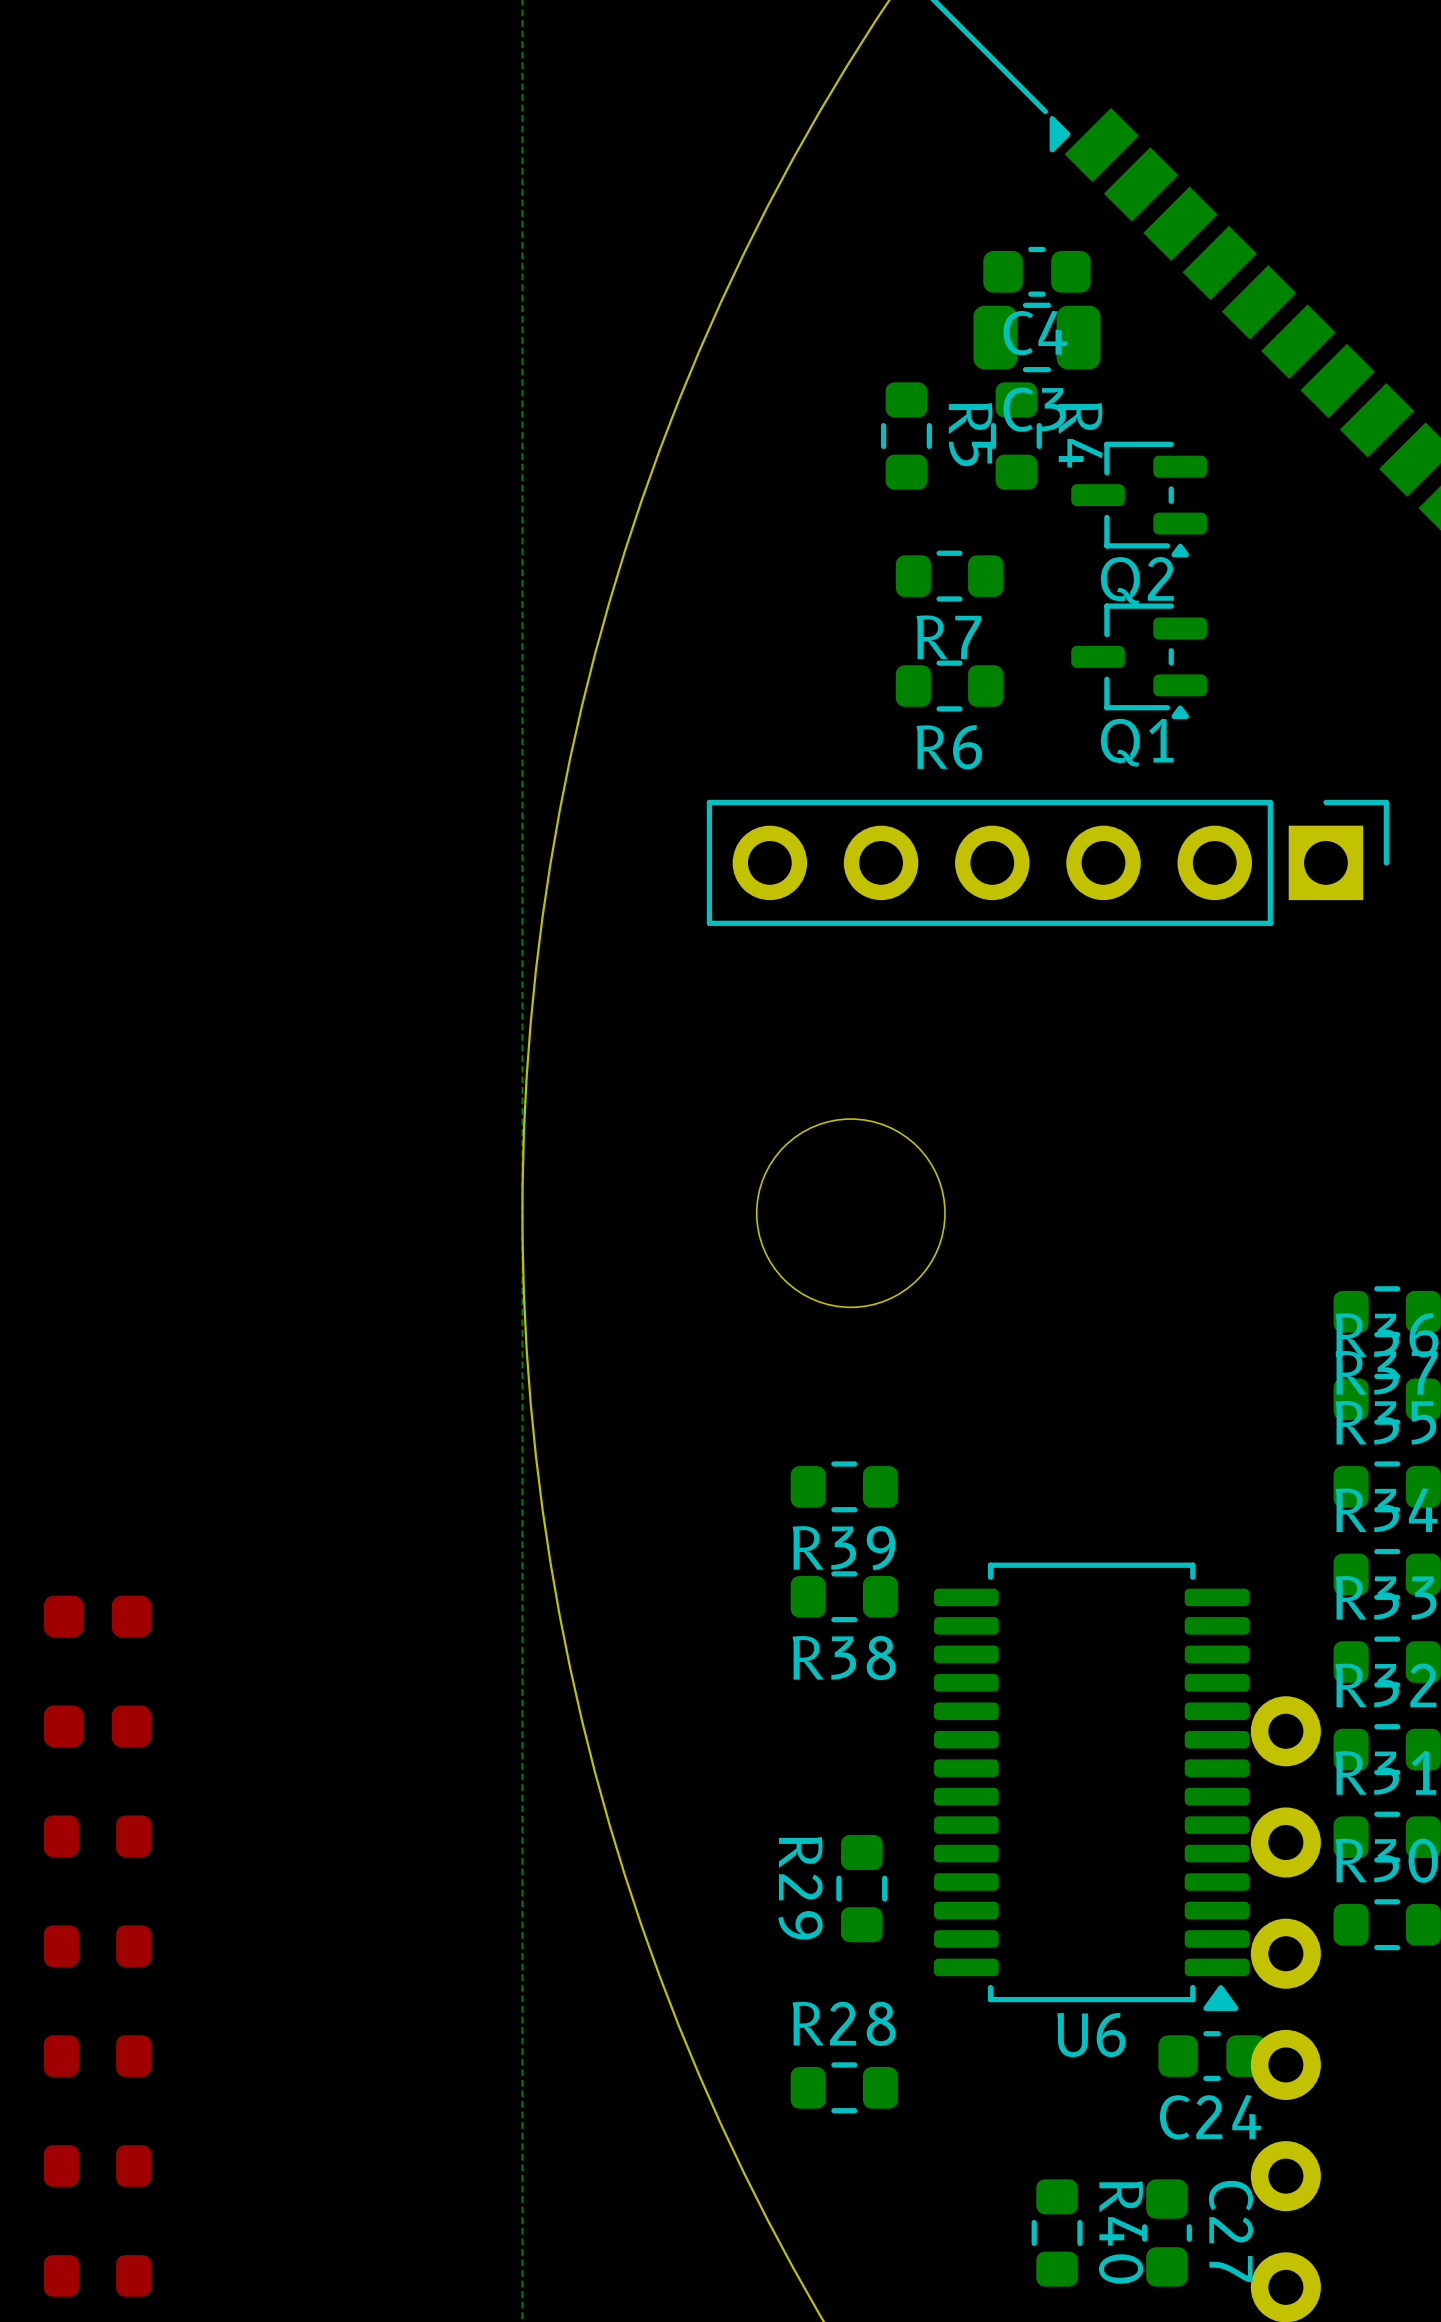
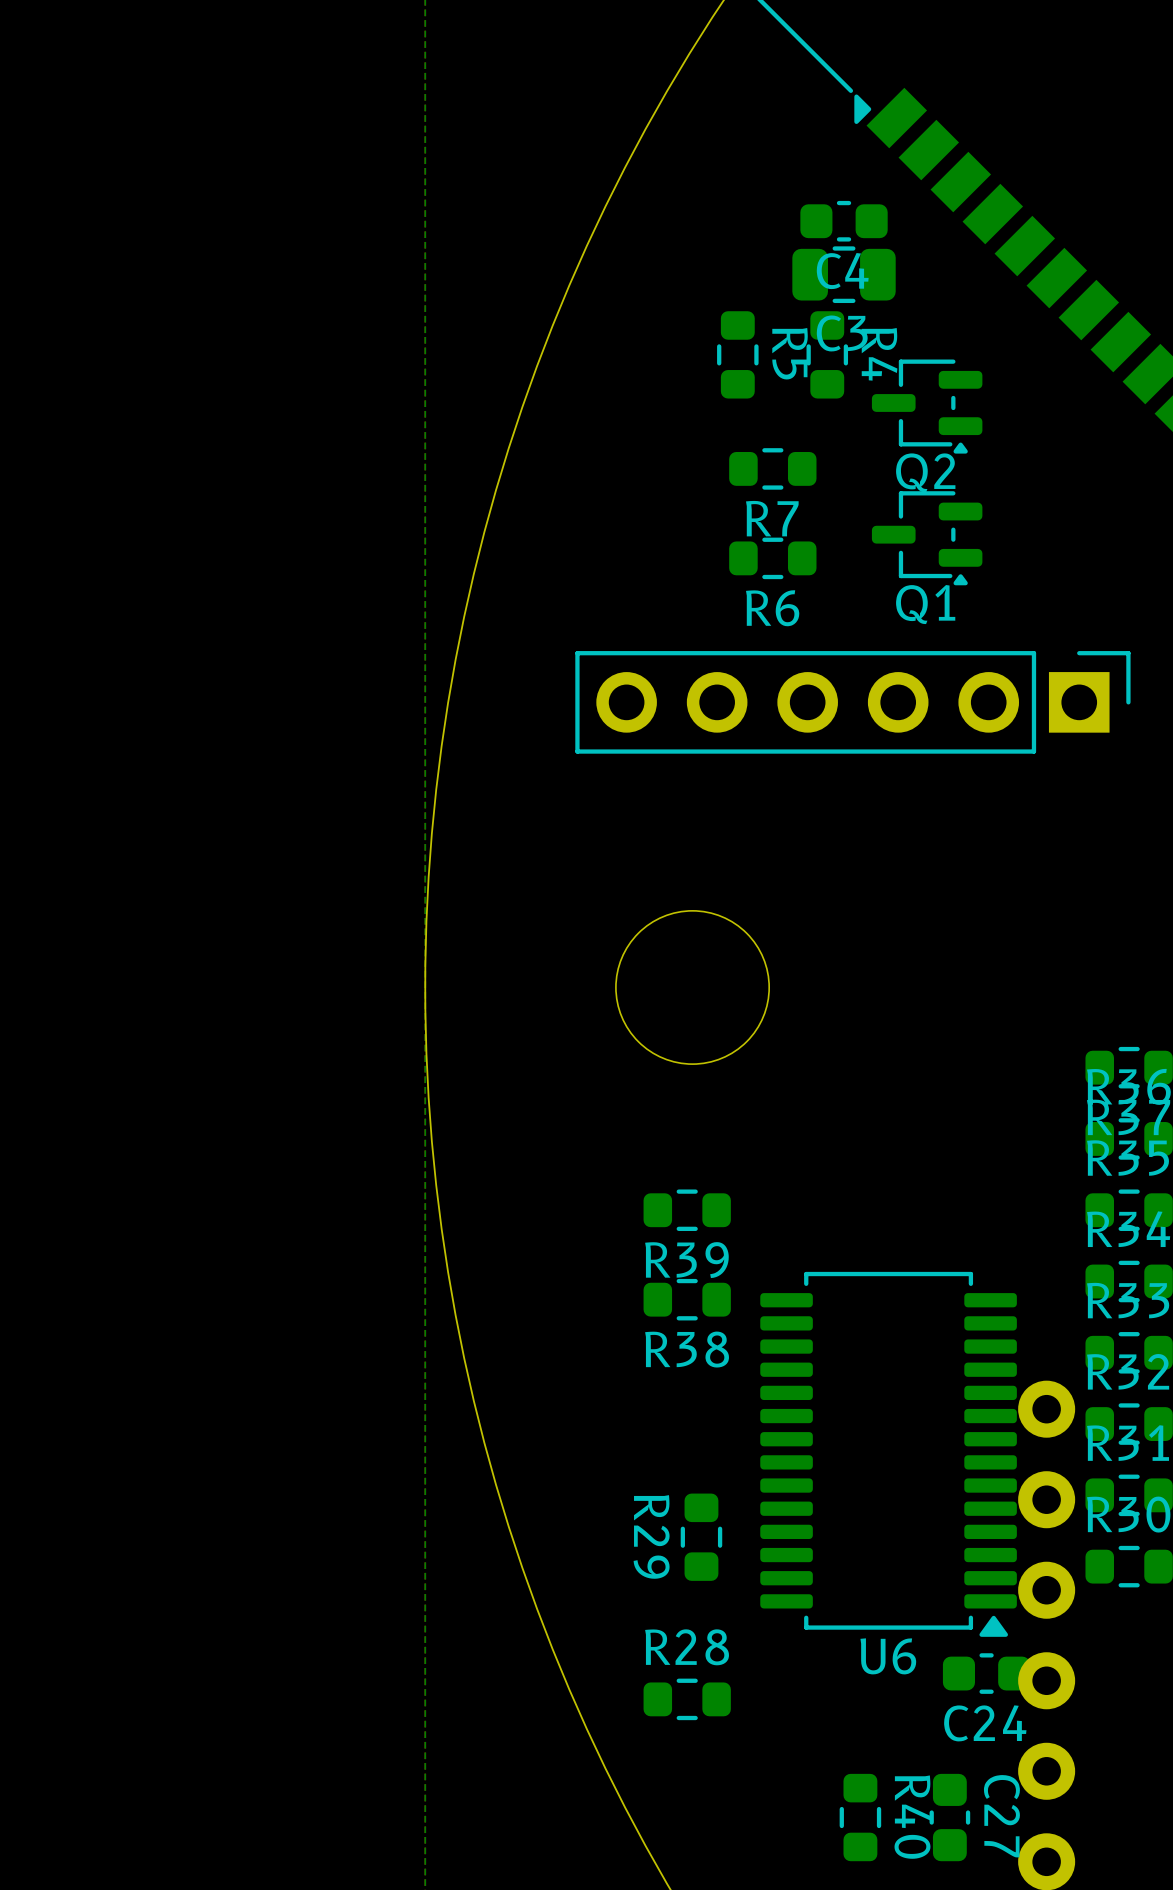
part: (97, 1616) -> none
part: (97, 1726) -> none
part: (97, 1836) -> none
part: (97, 1946) -> none
part: (97, 2056) -> none
part: (97, 2165) -> none
part: (97, 2275) -> none

